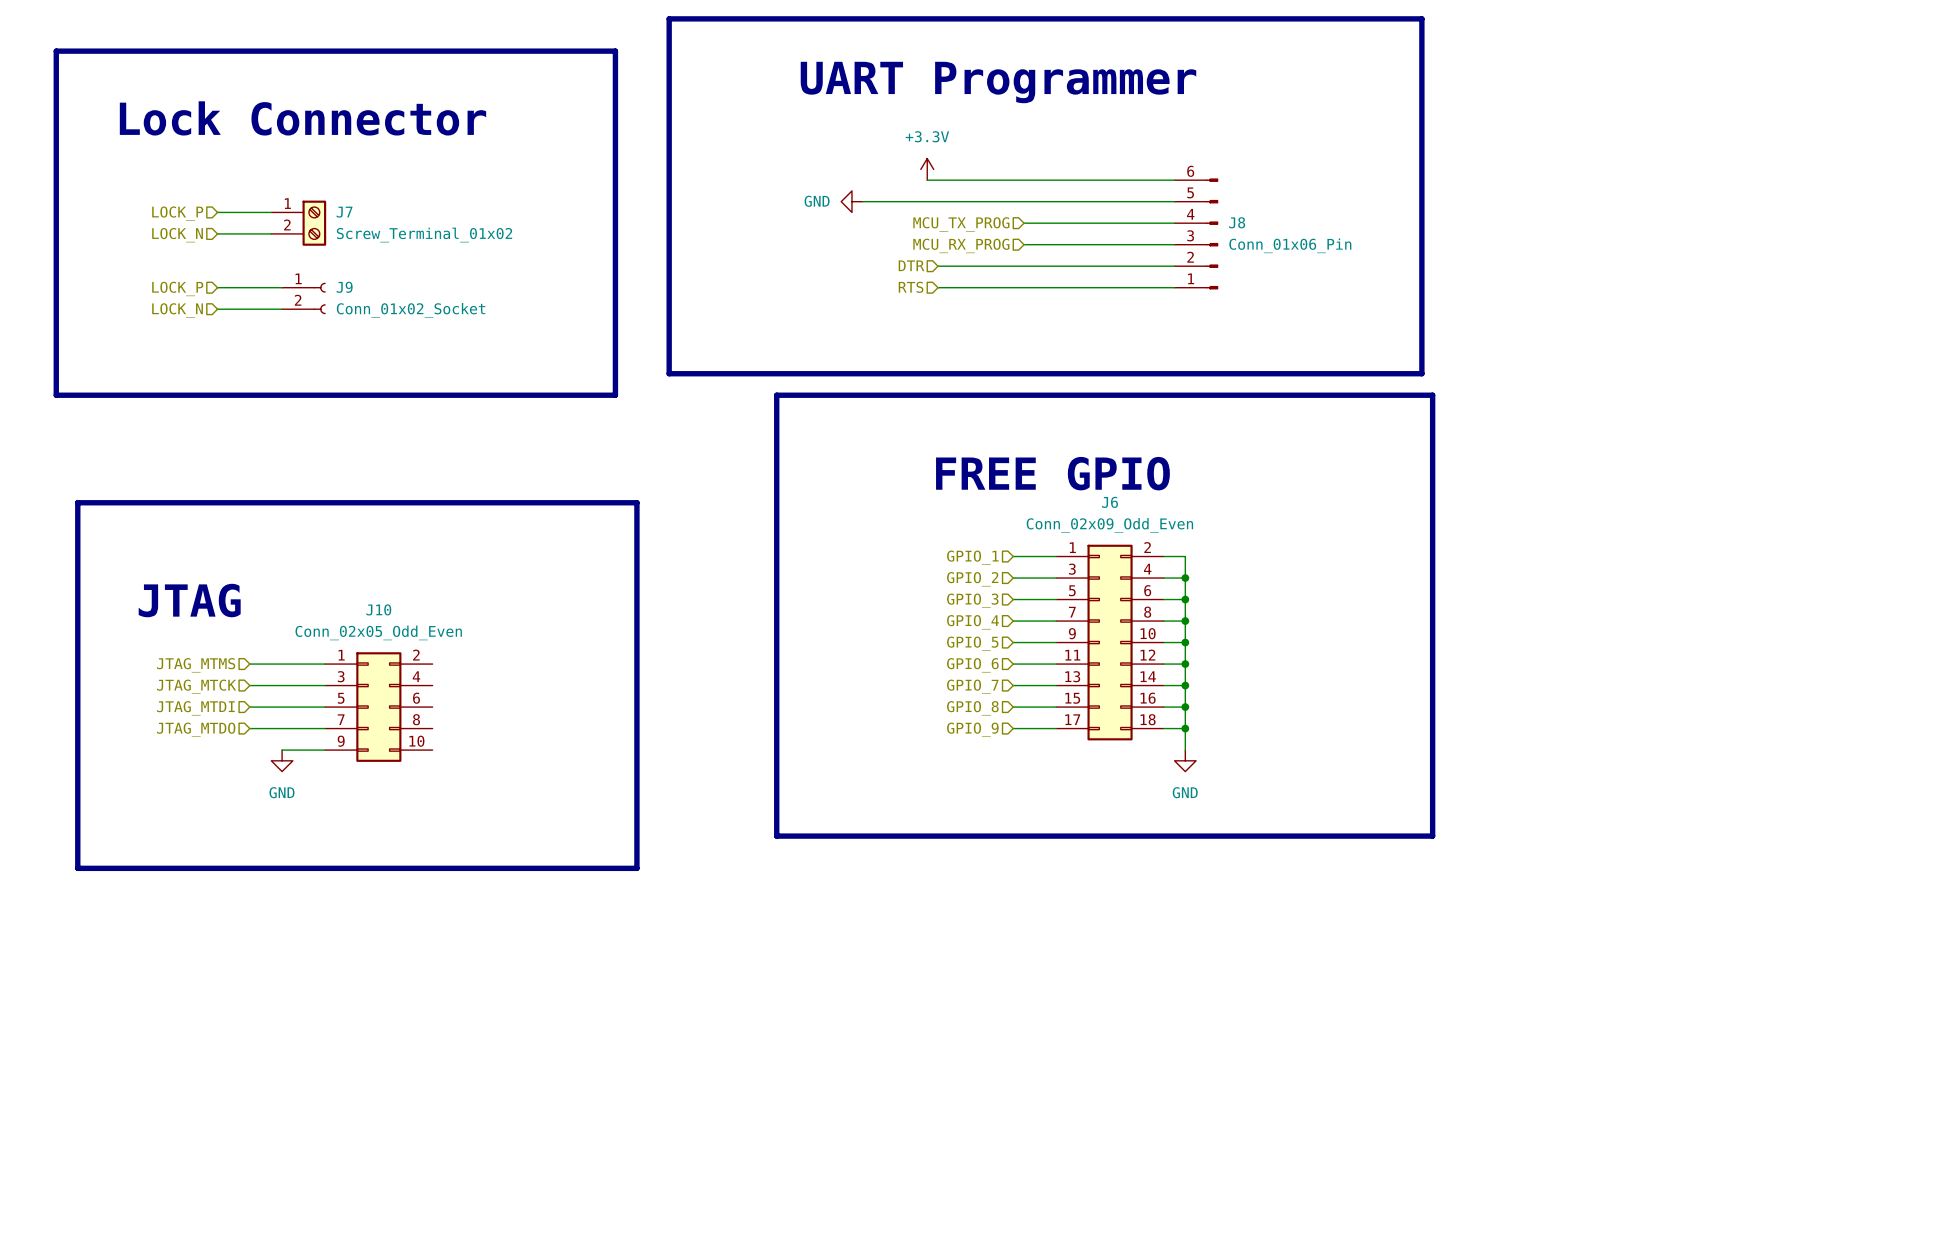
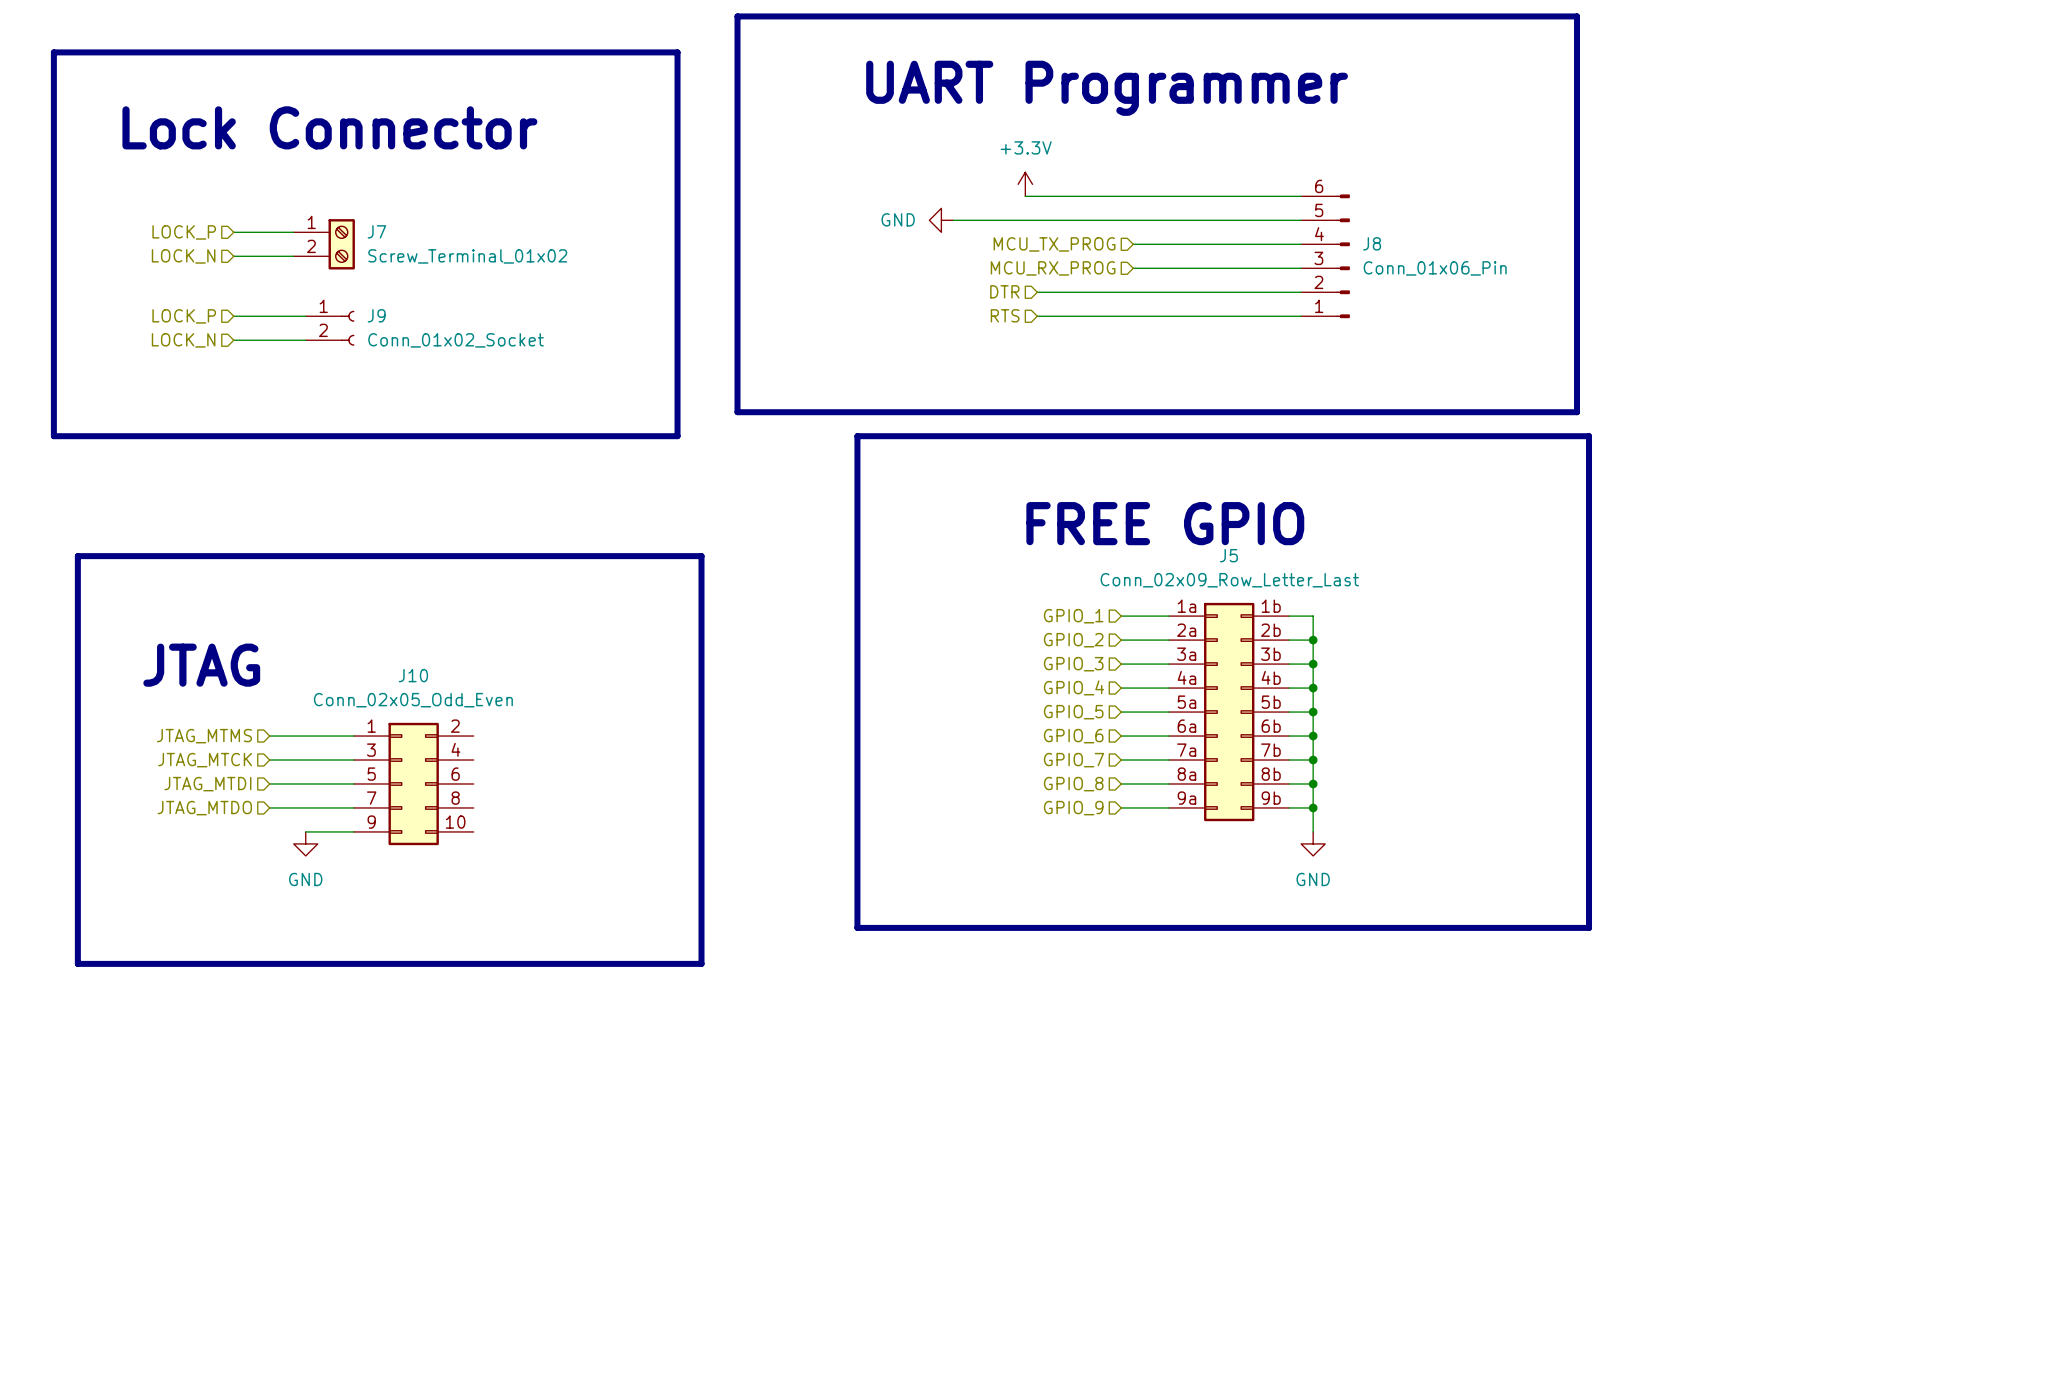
J6 name: J6 (1109, 502) -> J5 (1228, 555)
J6 value: Conn_02x09_Odd_Even (1109, 525) -> Conn_02x09_Row_Letter_Last (1229, 580)
J6 symbol: [1056, 544, 1164, 741] -> [1169, 602, 1290, 822]

